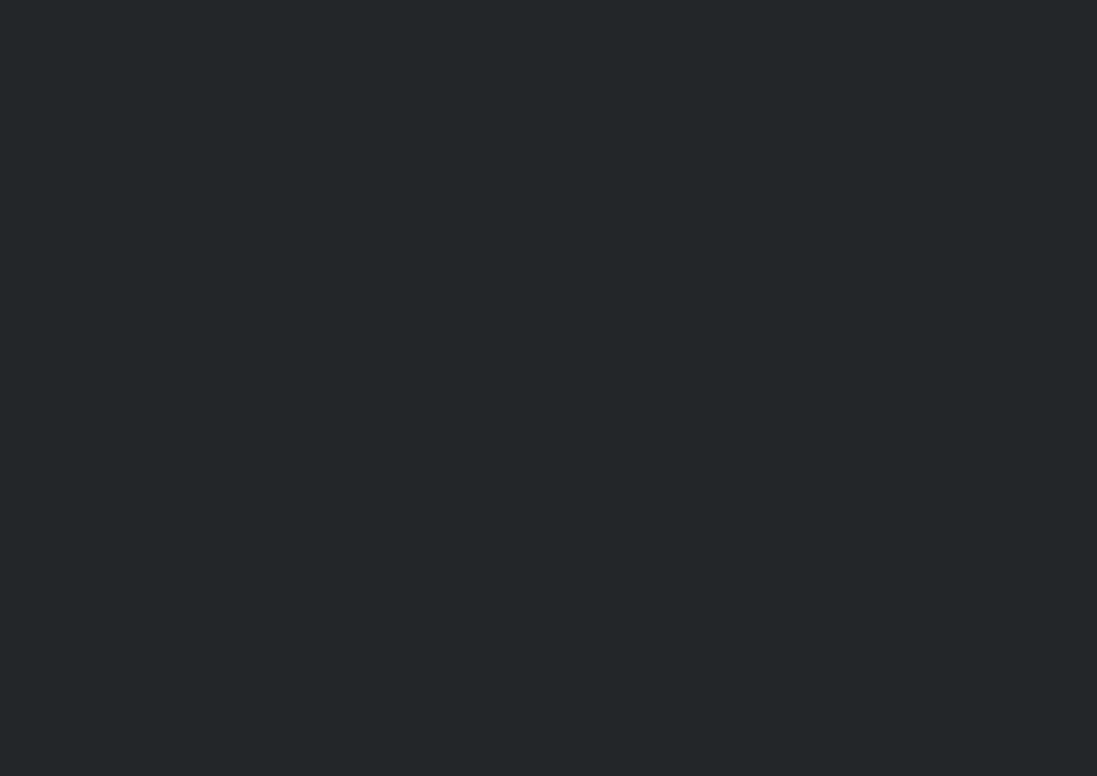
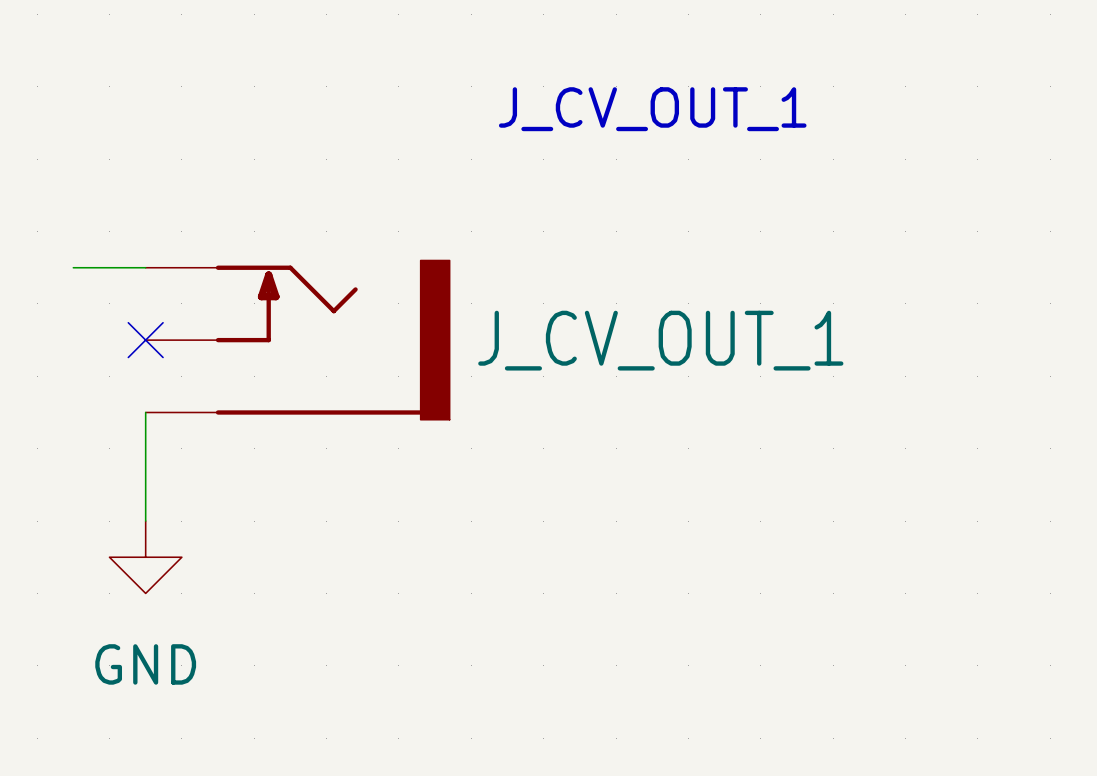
text: none -> J_CV_OUT_1 (652, 109)
wire: none -> (73, 267) (145, 267)
no-connect mark: none -> (145, 340)
J_CV_OUT_1: none -> (297, 340)
wire: none -> (145, 412) (145, 521)
power symbol: none -> GND (145, 557)

